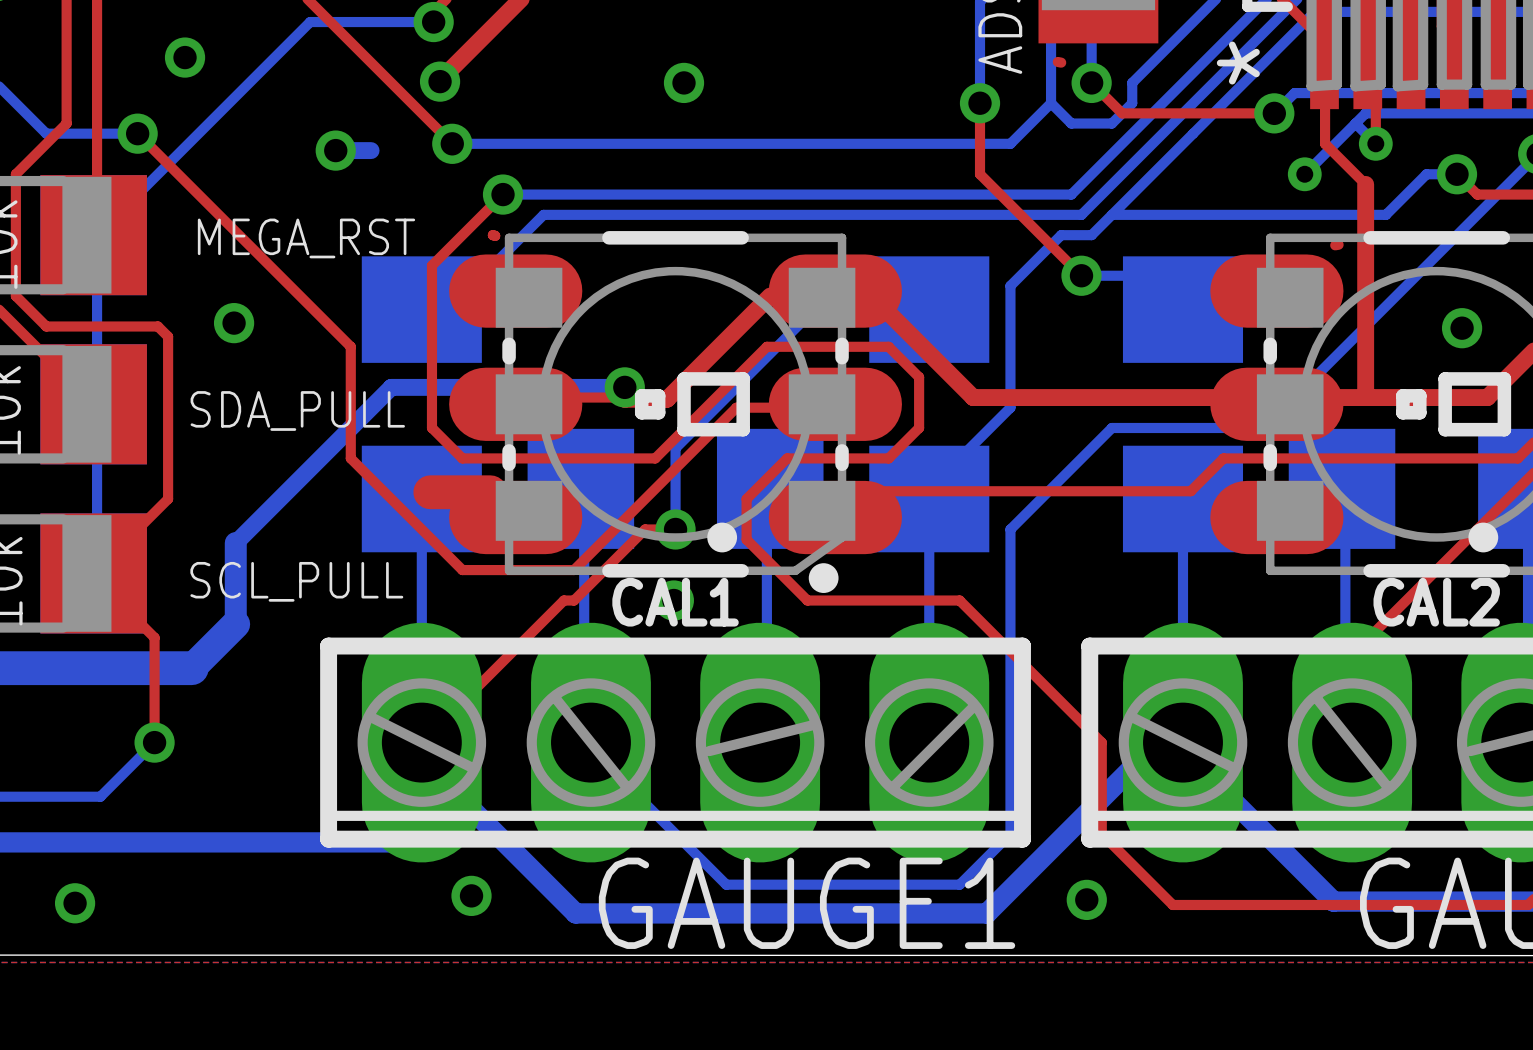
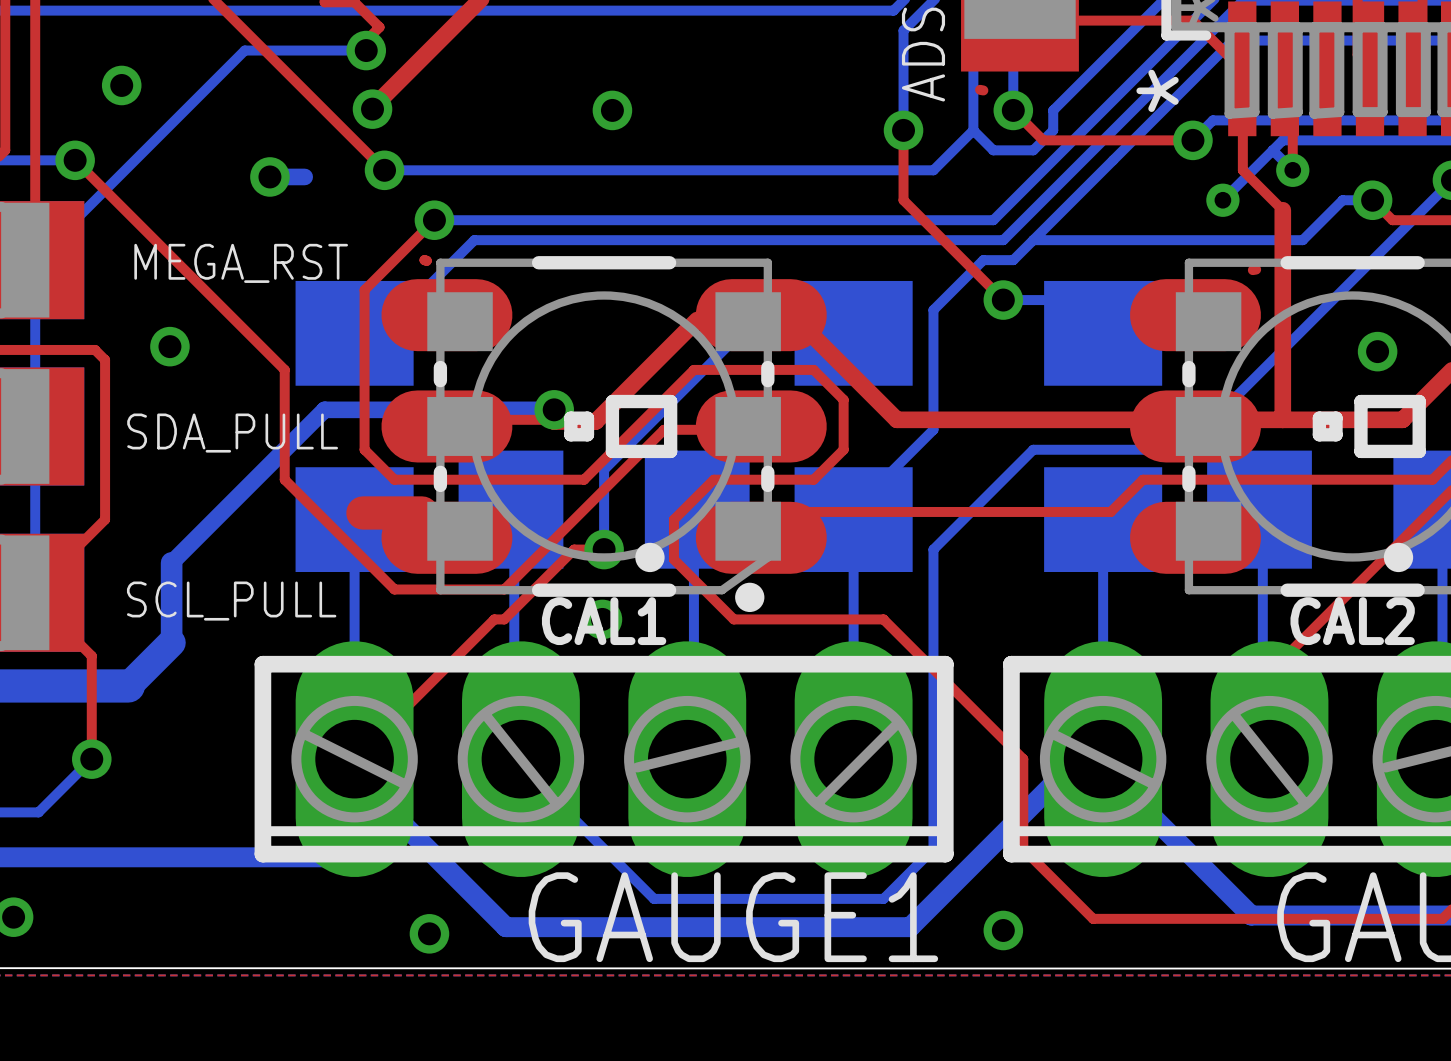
via position: (471, 895) -> (429, 933)
via position: (1086, 899) -> (1003, 930)

